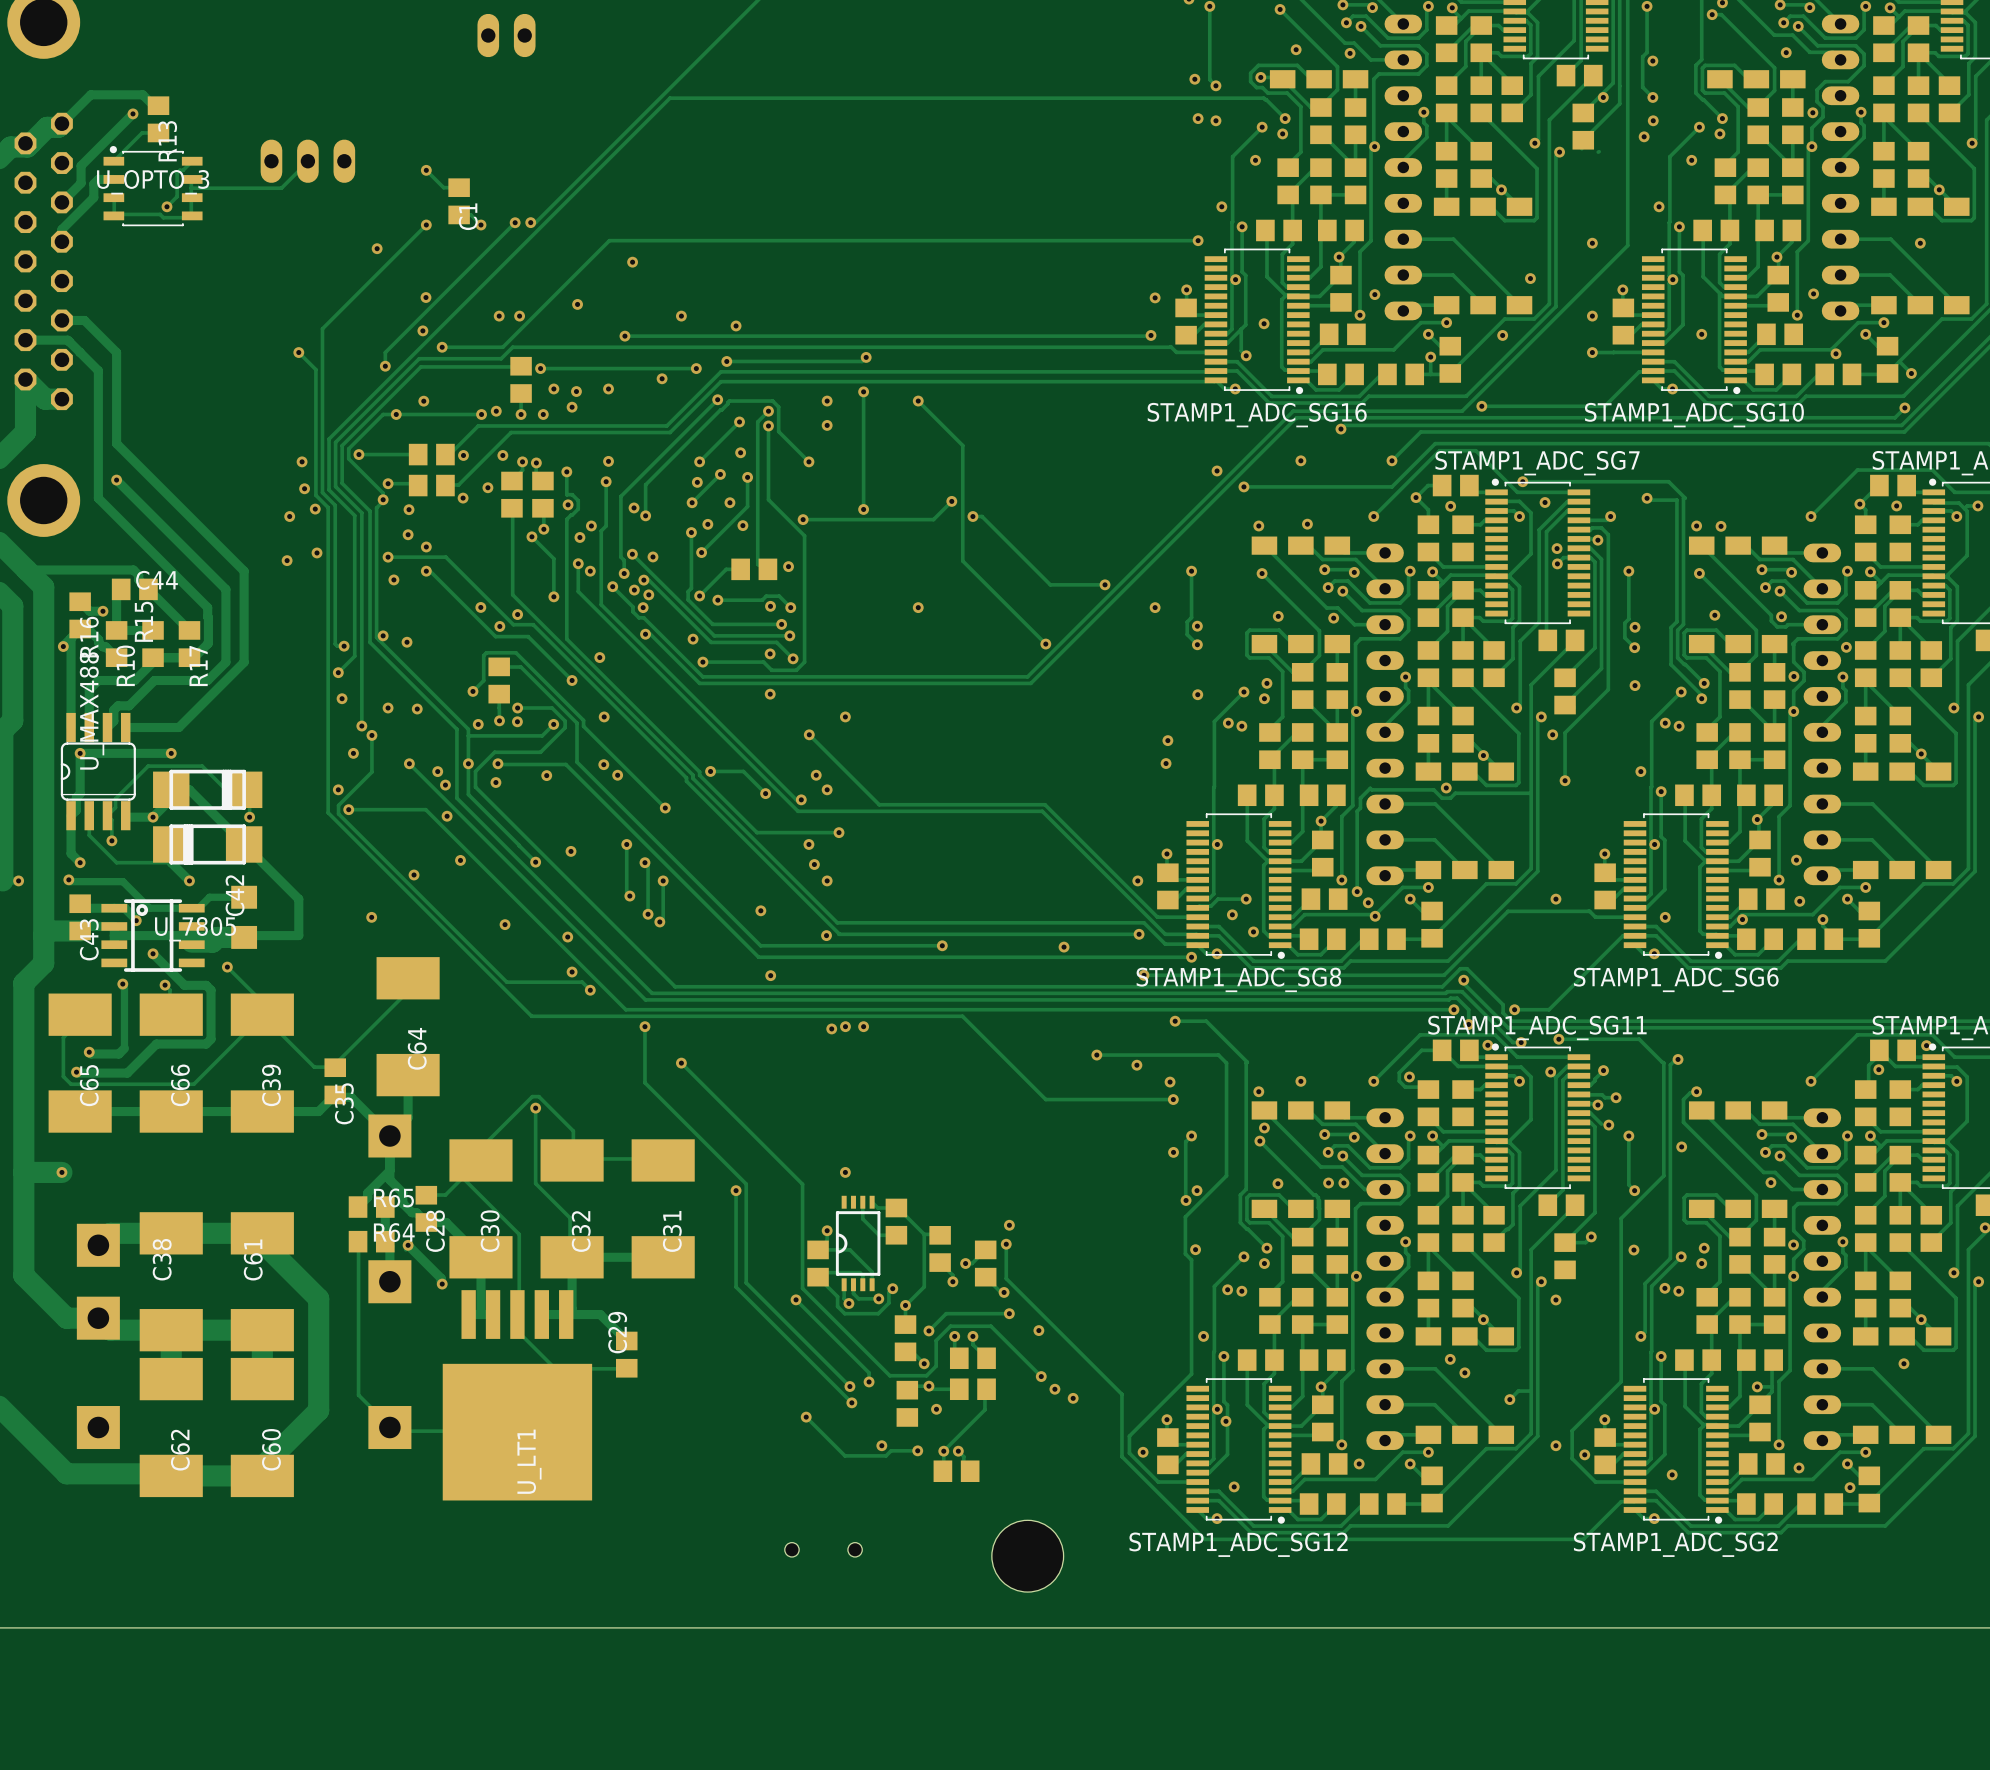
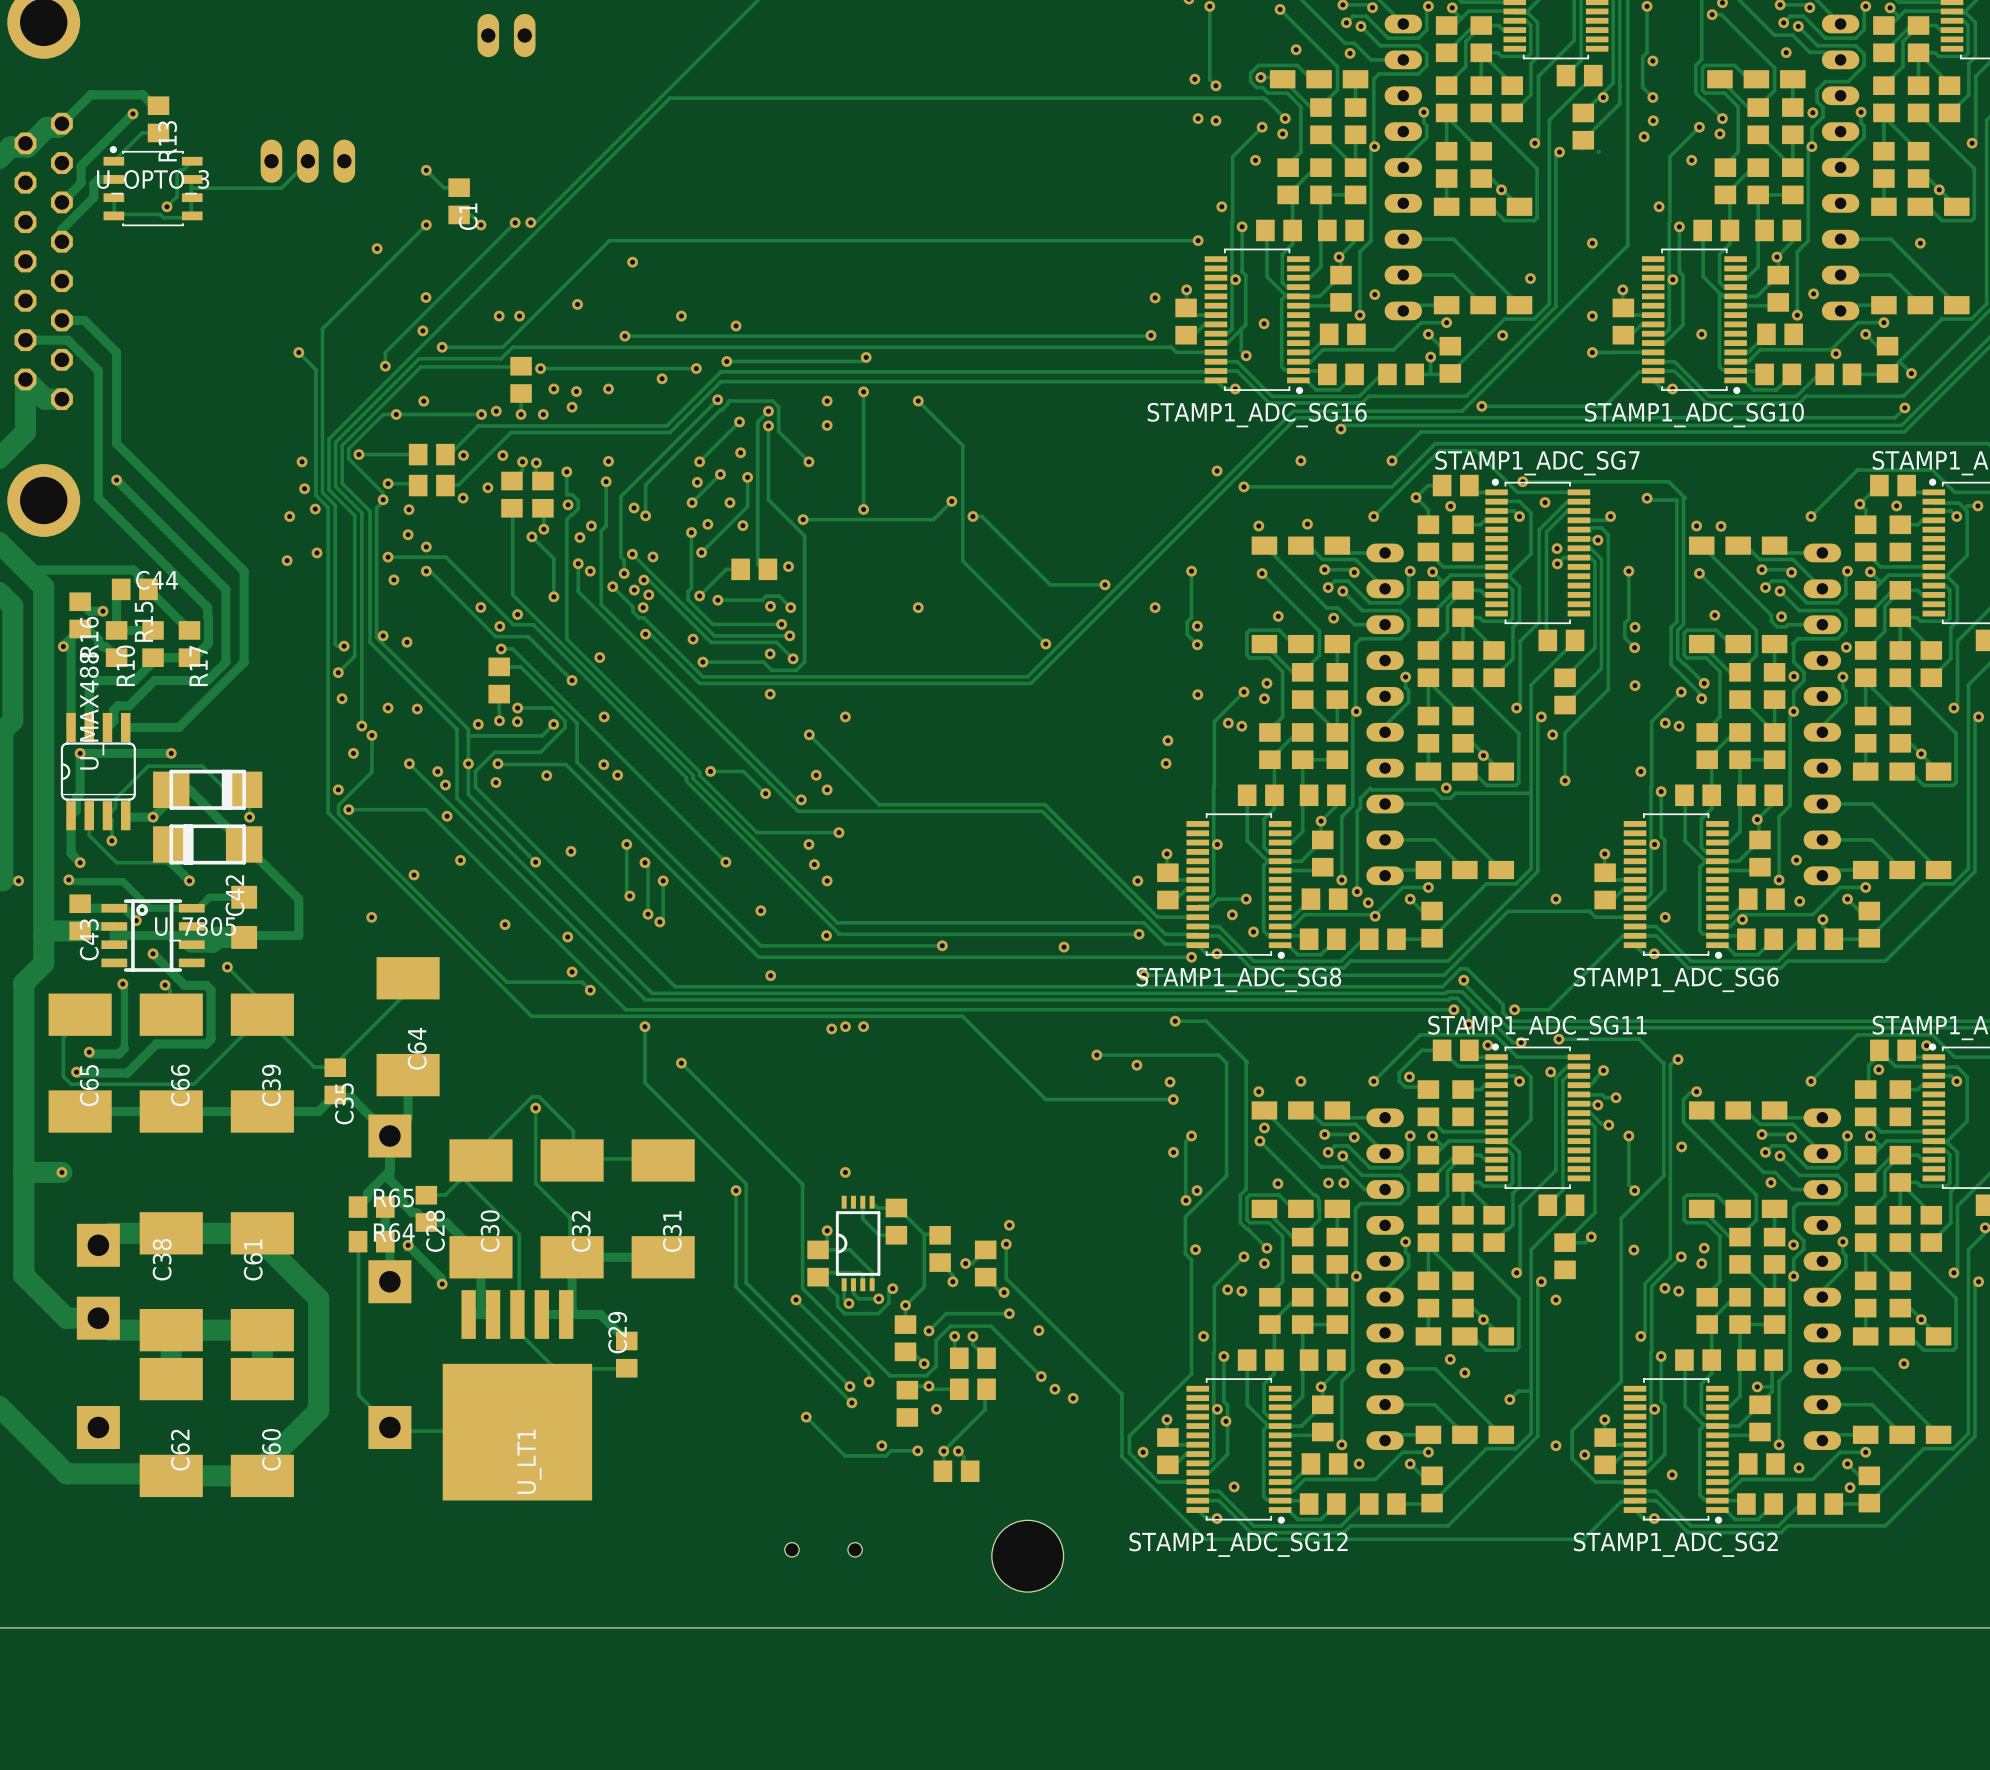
track: none -> (501, 648) (512, 648) (725, 862)
track: (472, 691) (483, 680) (483, 655) (486, 652) (515, 652) (583, 720) (583, 726) (665, 808) -> none
via position: (472, 691) -> (501, 648)
via position: (665, 808) -> (725, 862)

